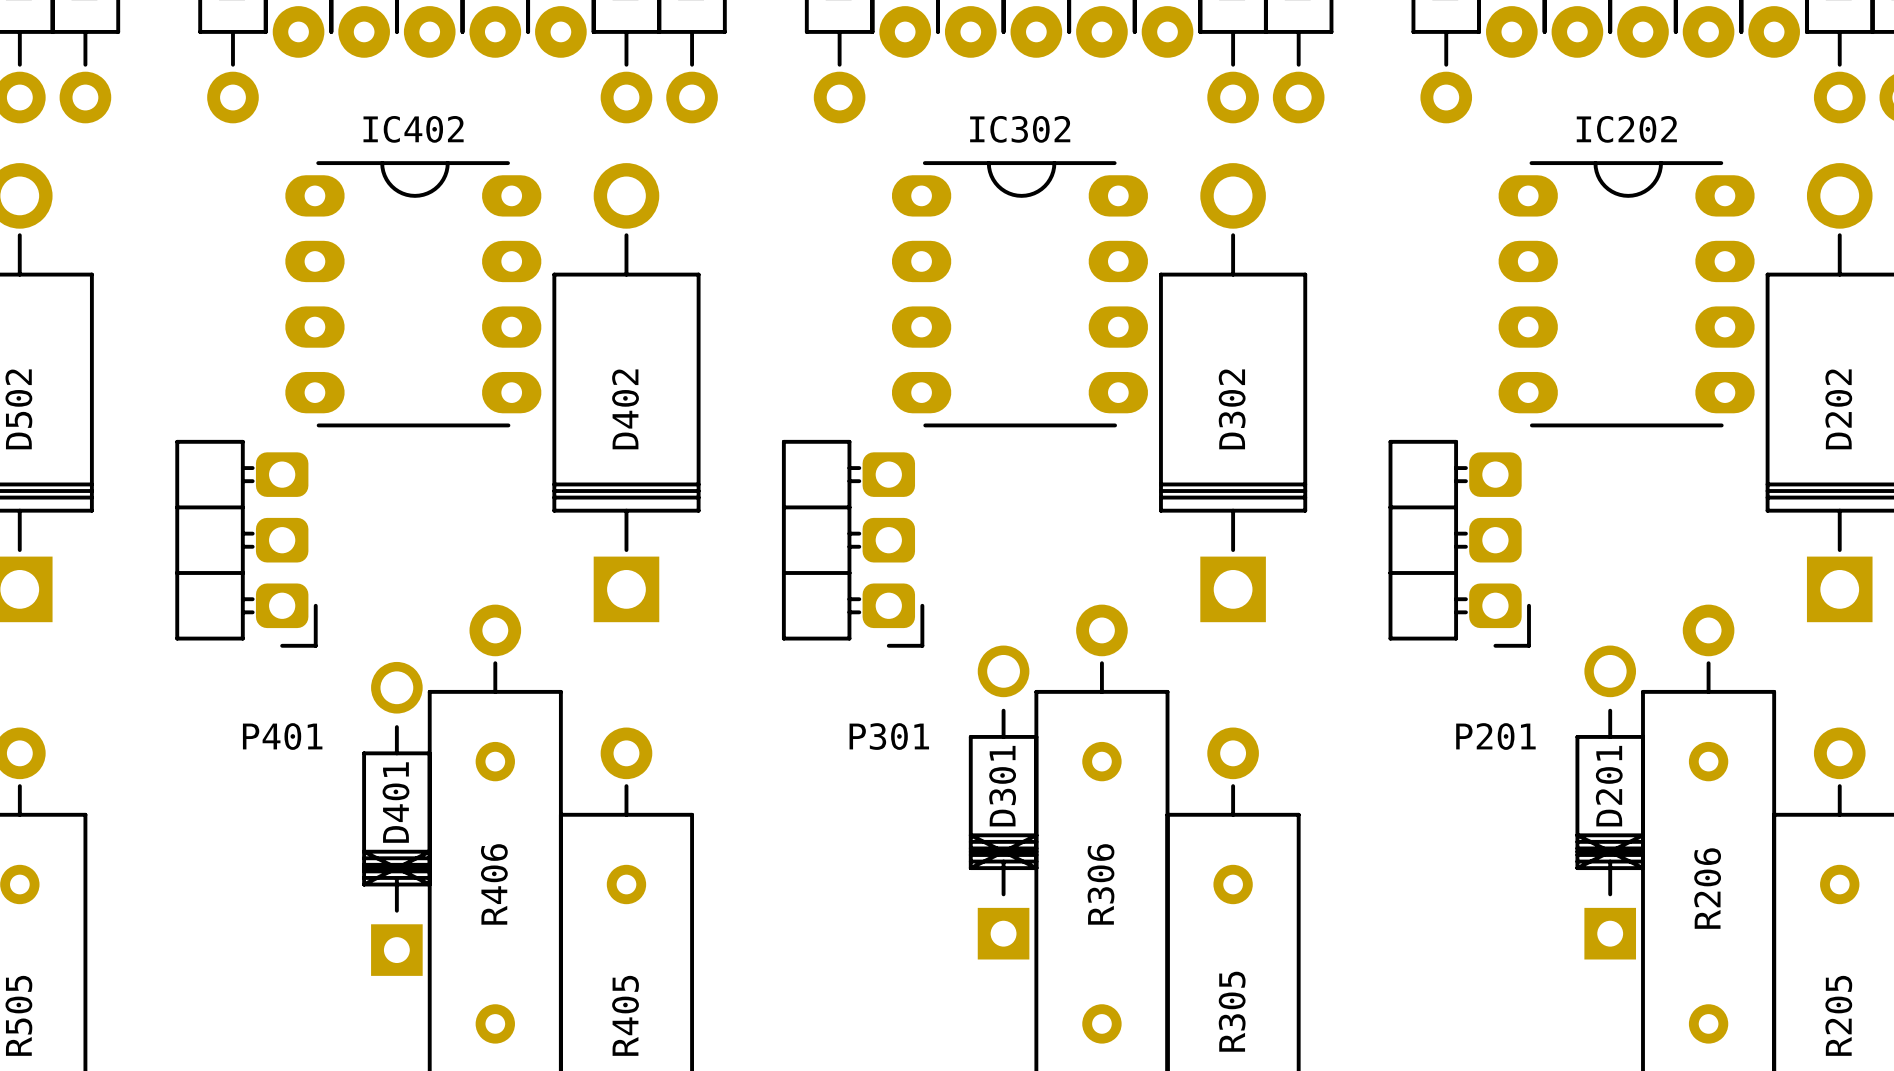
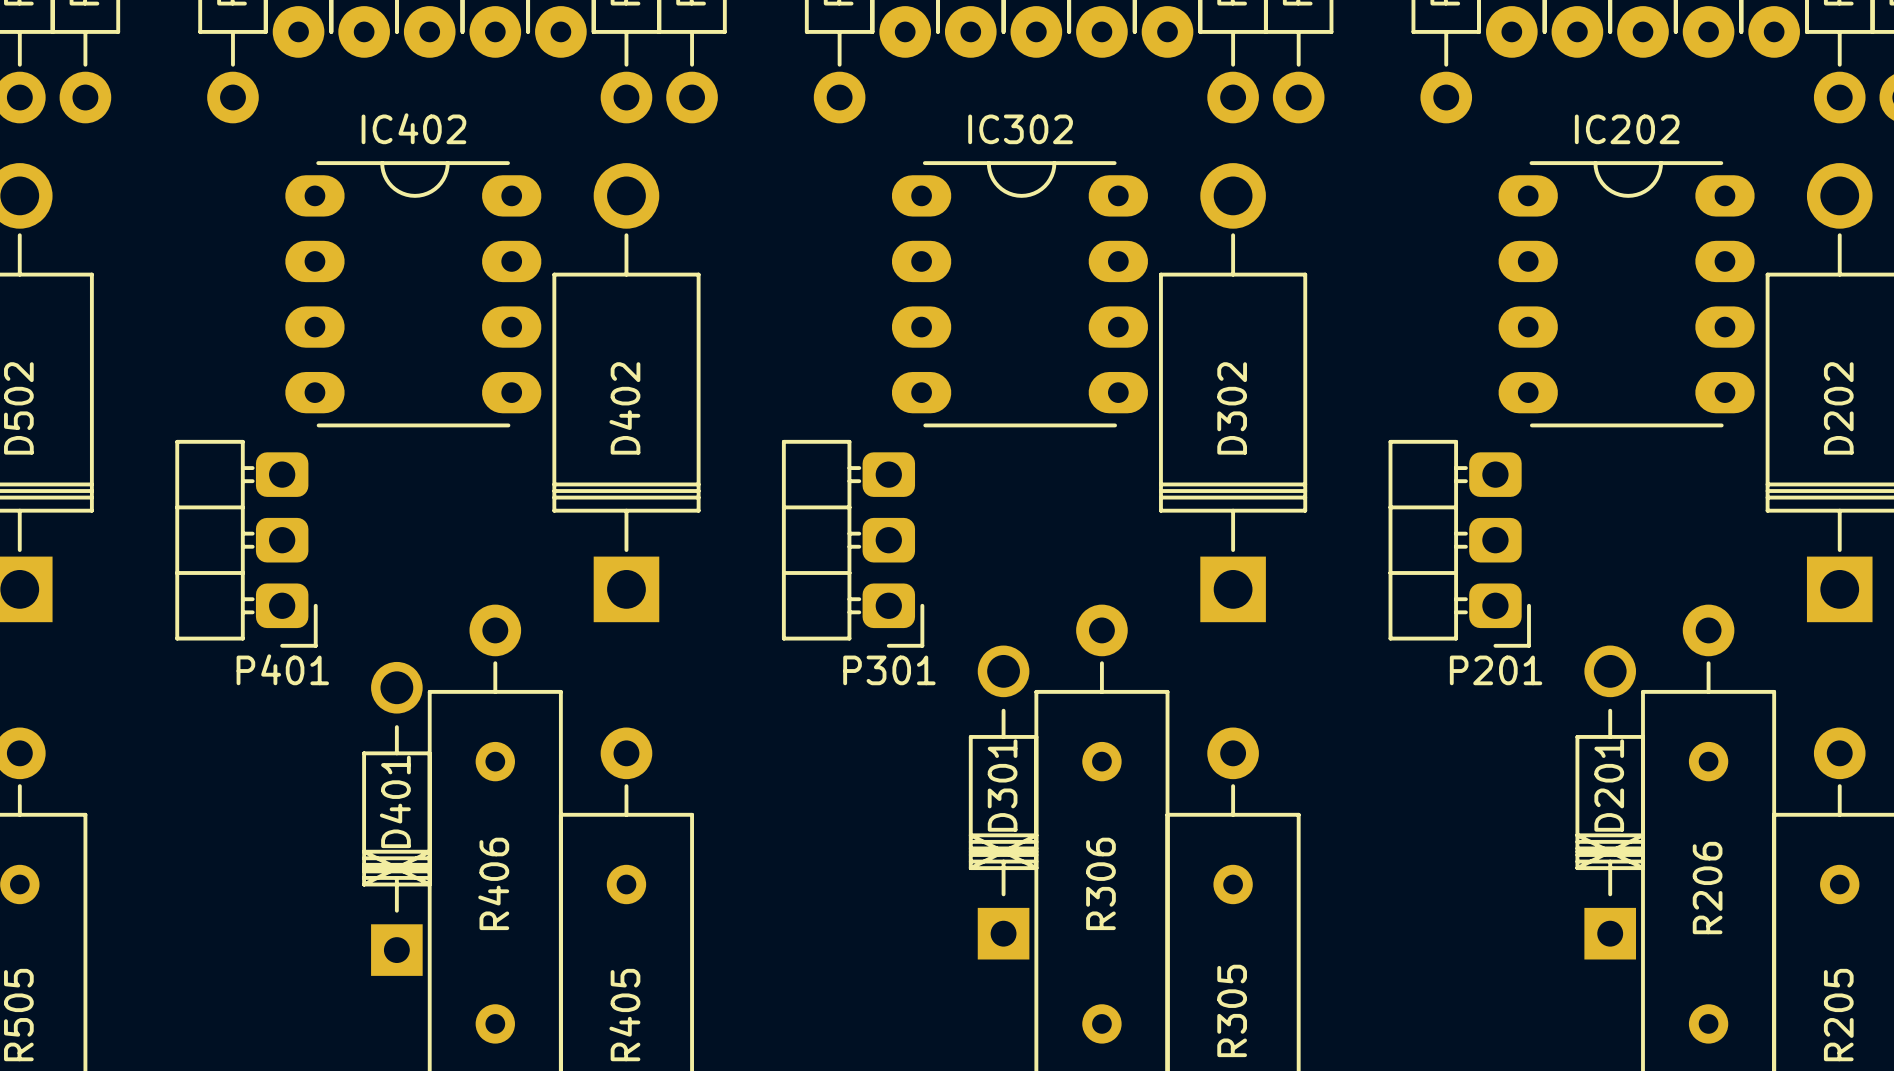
P401 name position: P401 (282, 736) -> P401 (282, 669)
P301 name position: P301 (889, 736) -> P301 (889, 670)
P201 name position: P201 (1495, 736) -> P201 (1496, 670)

